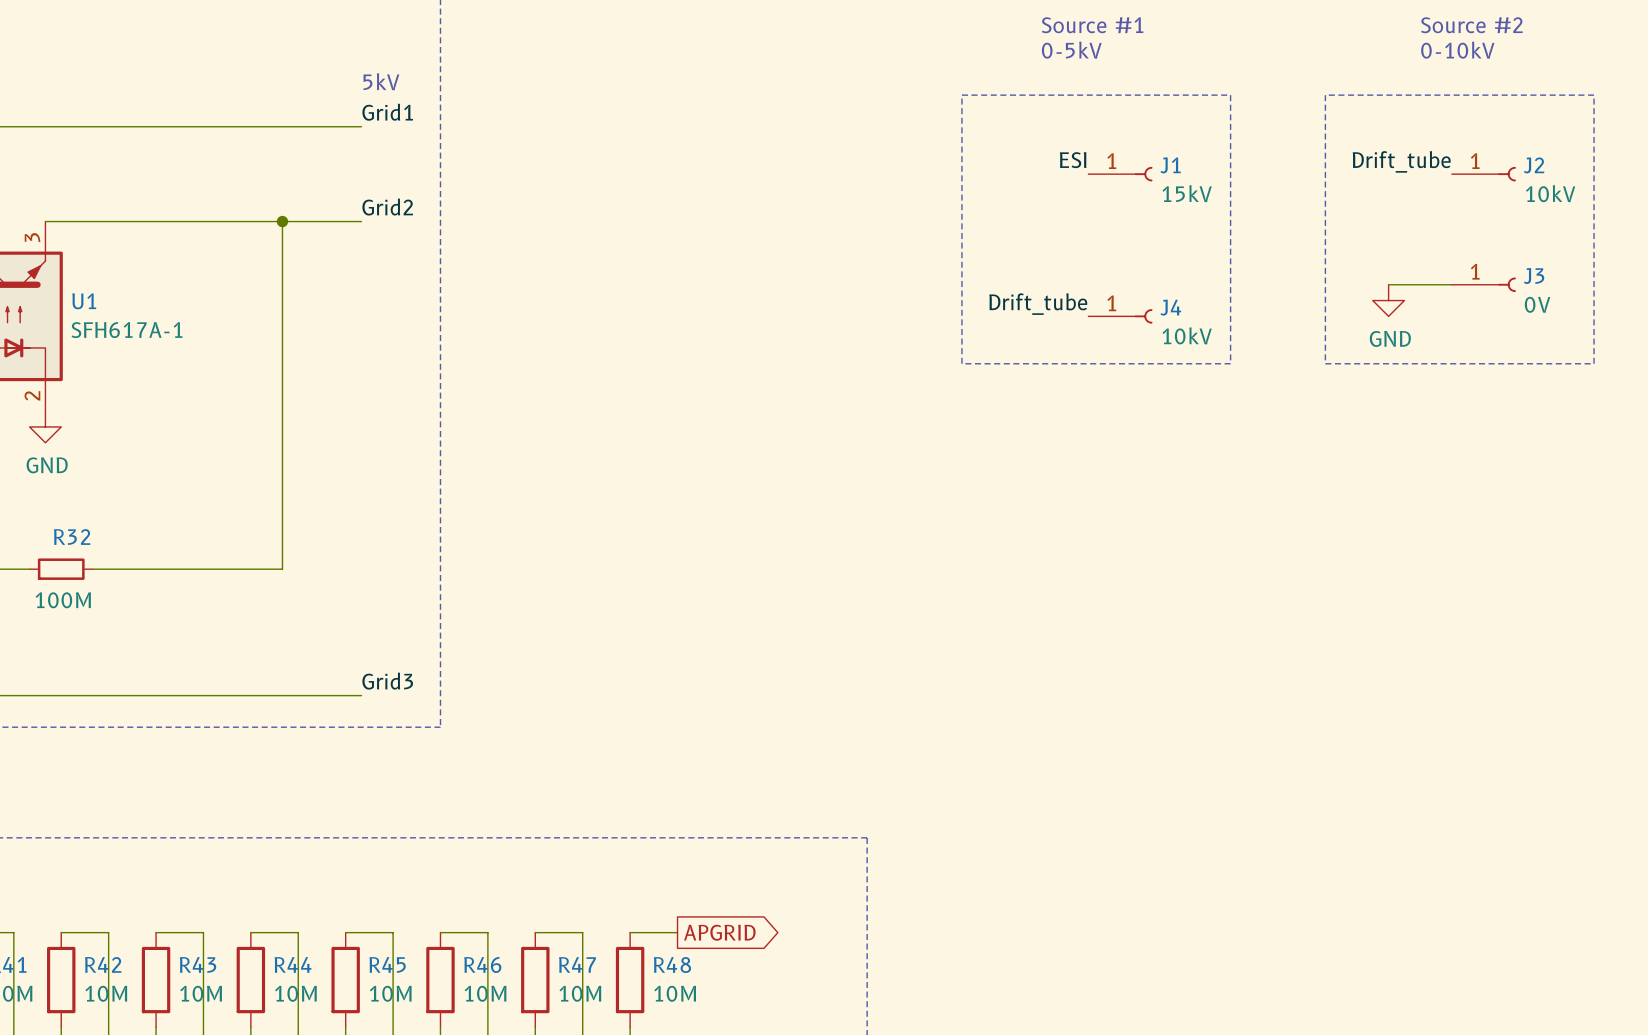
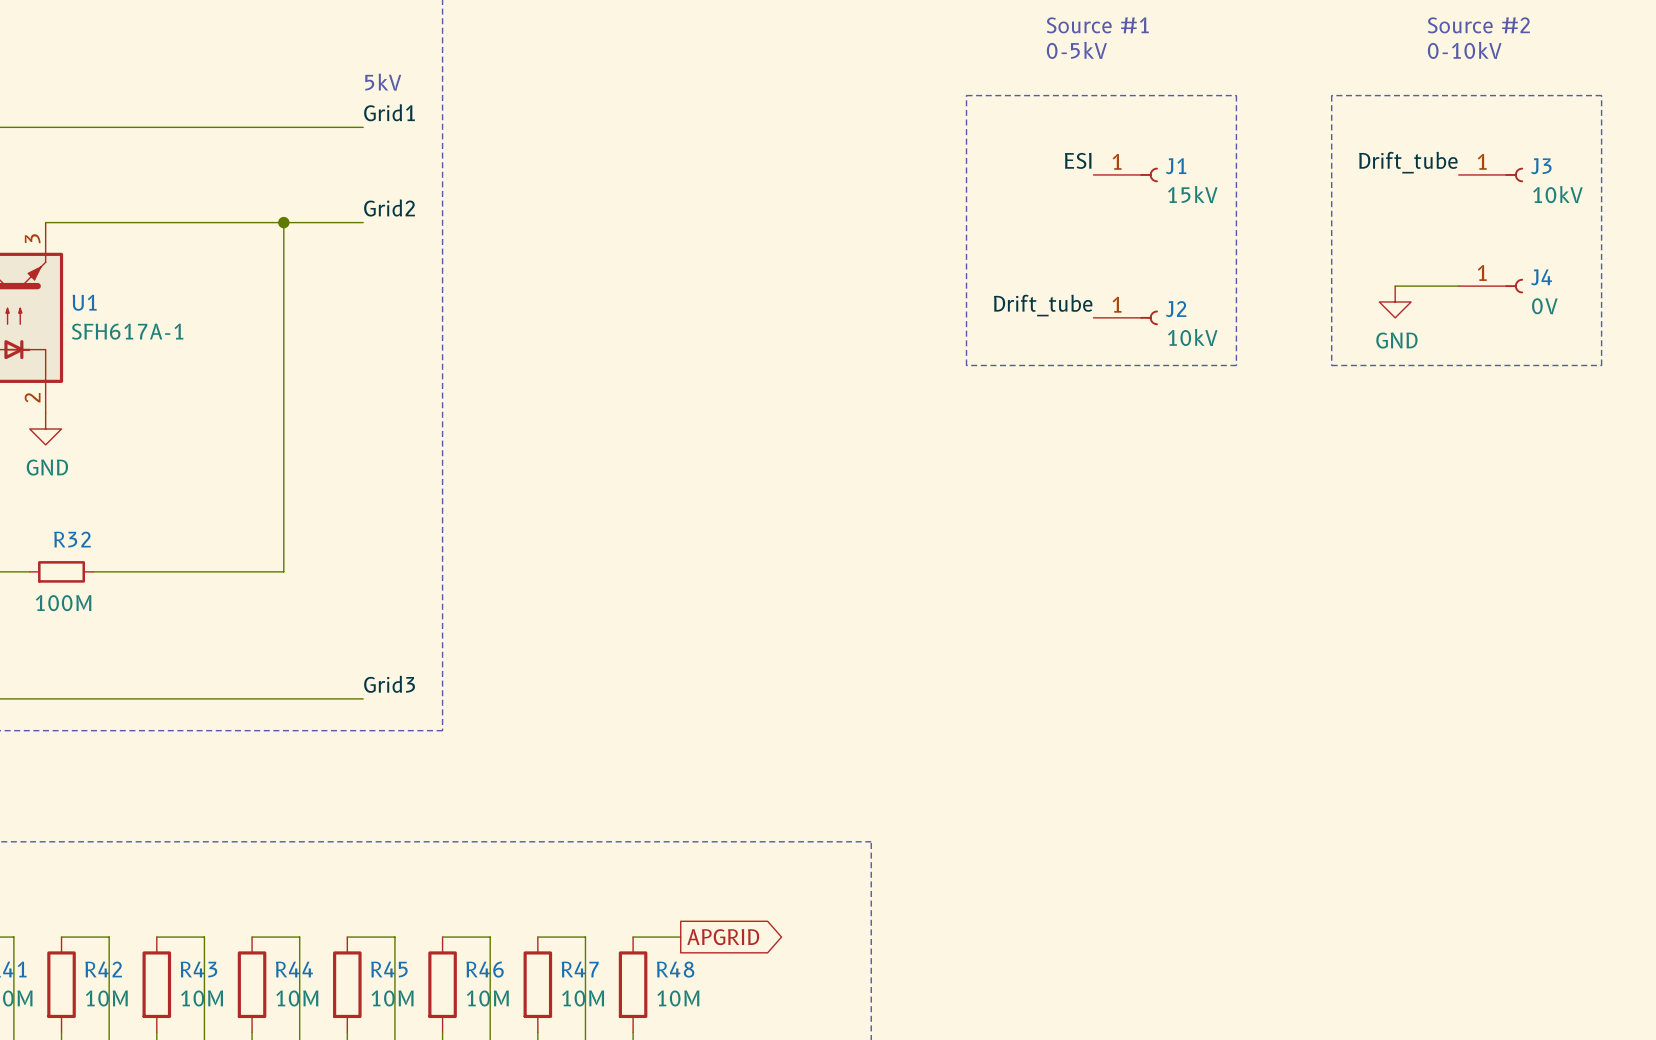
J2 name: J2 (1534, 165) -> J3 (1541, 166)
J3 name: J3 (1534, 276) -> J4 (1541, 277)
J4 name: J4 (1170, 307) -> J2 (1176, 309)

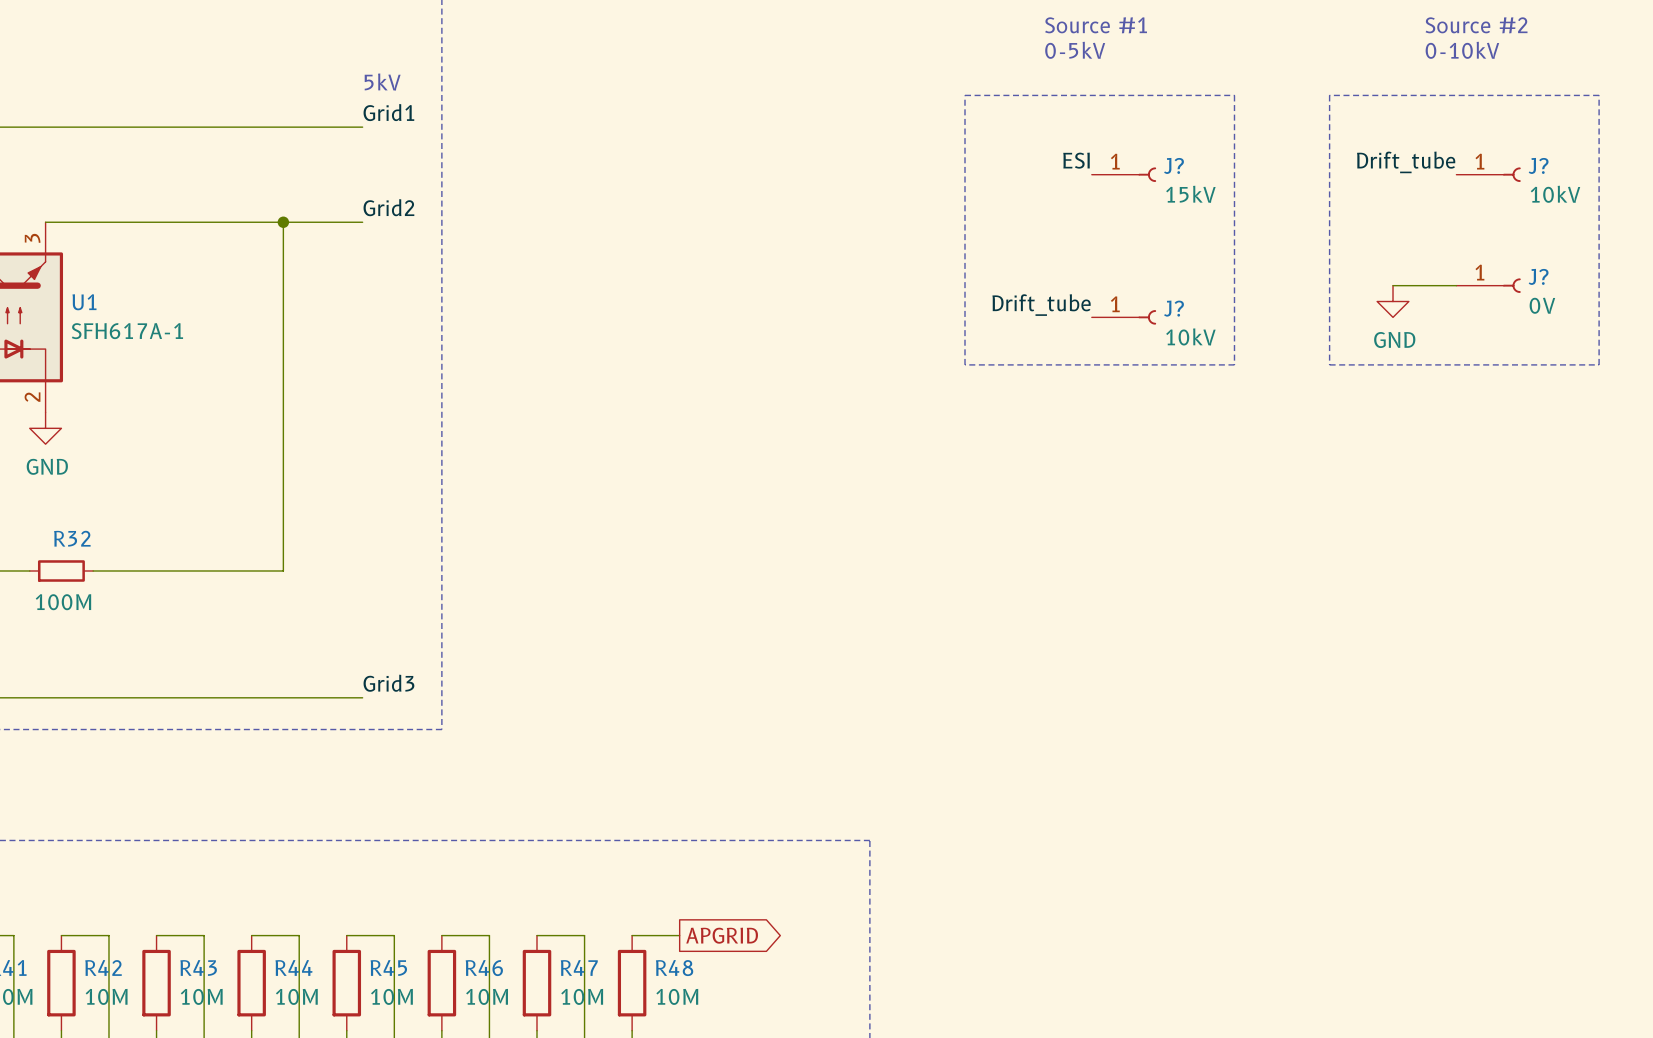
J1 name: J1 (1176, 166) -> J? (1174, 165)
J3 name: J3 (1541, 166) -> J? (1538, 165)
J4 name: J4 (1541, 277) -> J? (1538, 276)
J2 name: J2 (1176, 309) -> J? (1174, 308)

